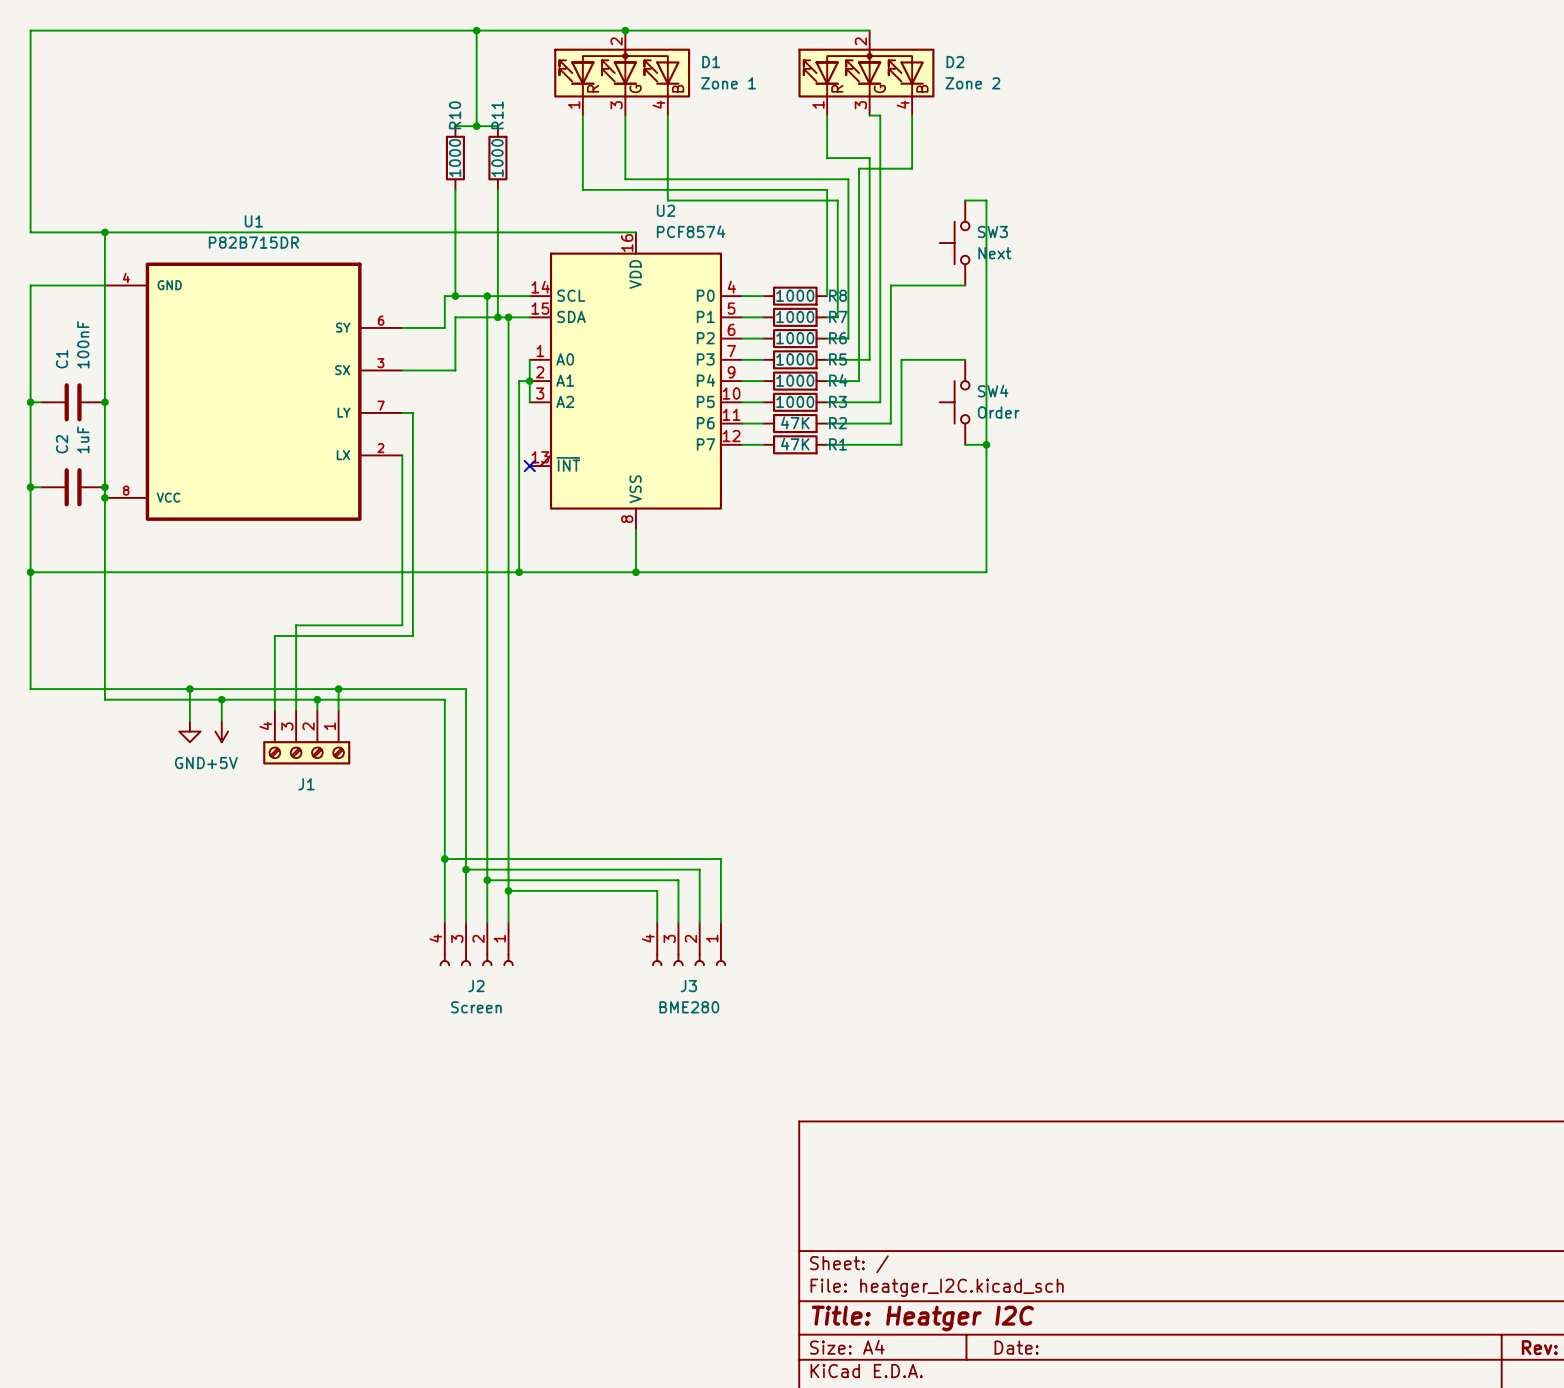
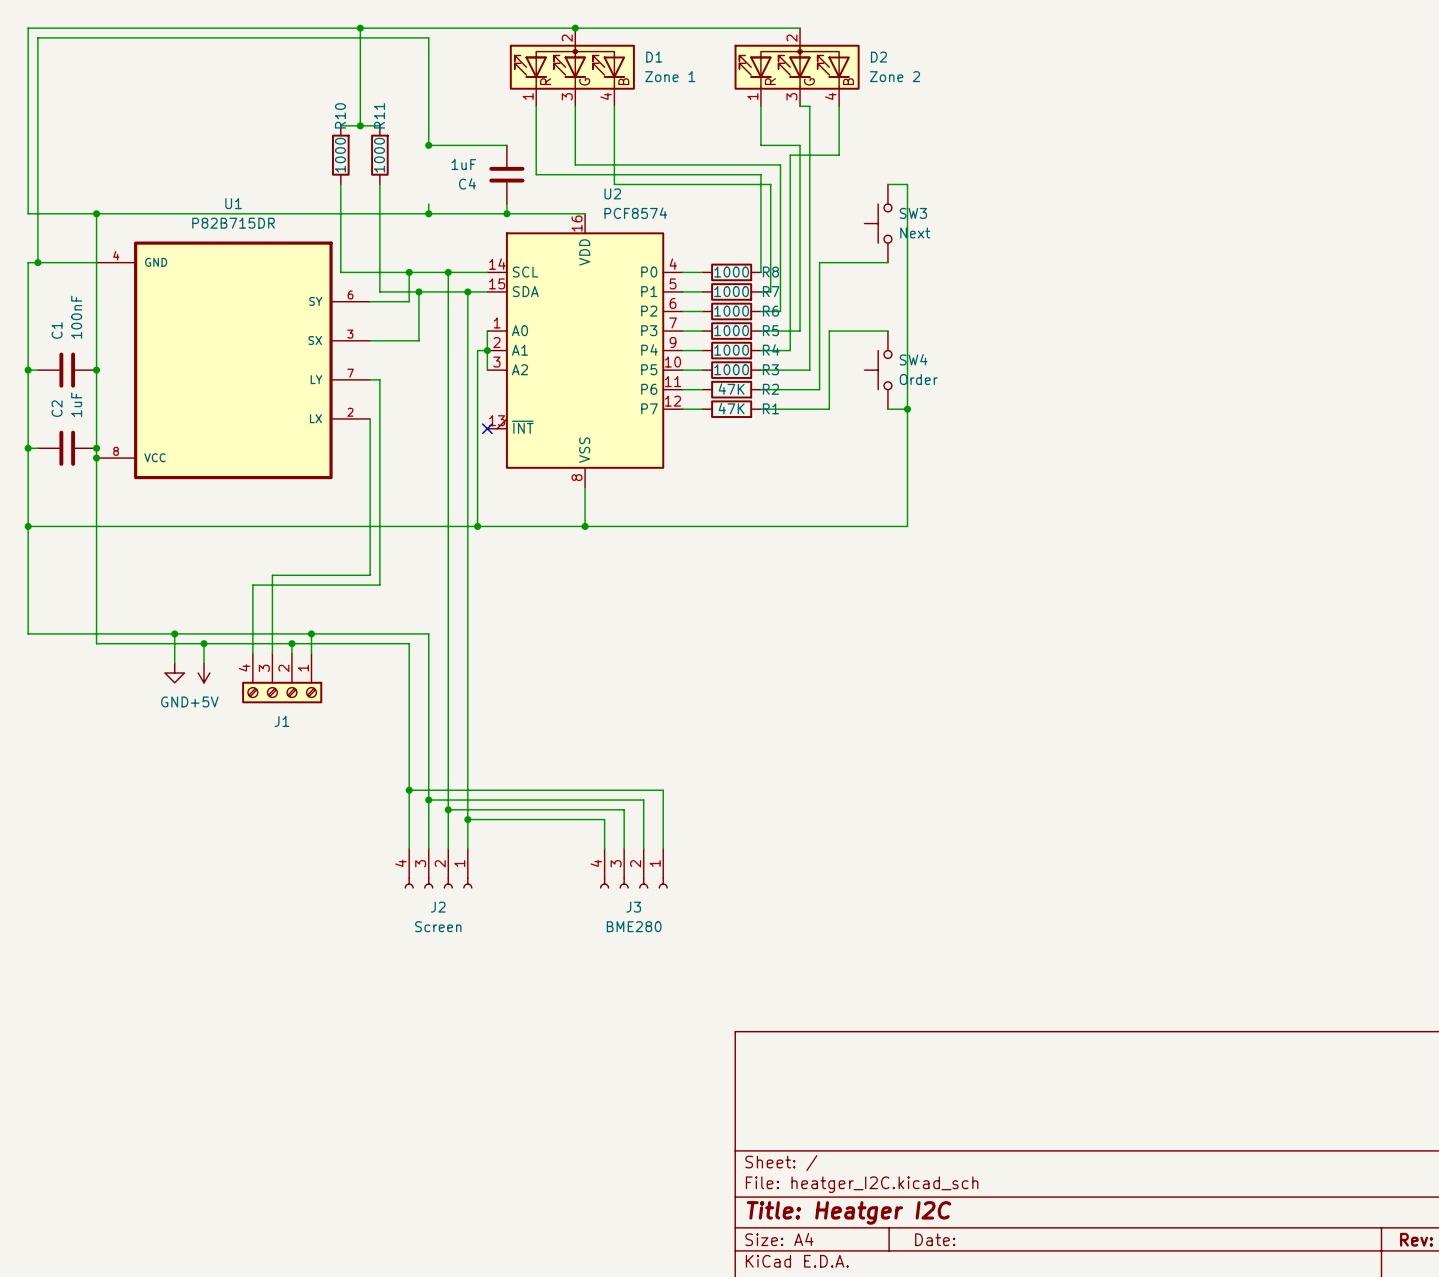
junction: none -> (360, 28)
wire: (476, 30) (476, 126) -> none
junction: (476, 30) -> none
wire: (455, 126) (497, 126) -> (340, 125) (379, 125)
junction position: (476, 126) -> (428, 145)
junction: none -> (360, 125)
R10 position: (455, 158) -> (340, 155)
R11 position: (497, 158) -> (379, 155)
wire: none -> (506, 145) (428, 145) (428, 37) (37, 37) (37, 262)
wire: (455, 189) (455, 296) -> (360, 28) (360, 125)
wire: (497, 189) (497, 317) -> none
C4: none -> 1uF (506, 174)
wire: none -> (340, 184) (340, 272) (409, 272)
wire: none -> (379, 184) (379, 291) (418, 291)
wire: none -> (428, 204) (428, 213)
wire: none -> (506, 204) (506, 213)
junction: none -> (428, 213)
junction: none -> (506, 213)
junction: none -> (37, 262)
junction: none -> (409, 272)
junction: (455, 296) -> none
junction: none -> (418, 291)
junction: (497, 317) -> none

